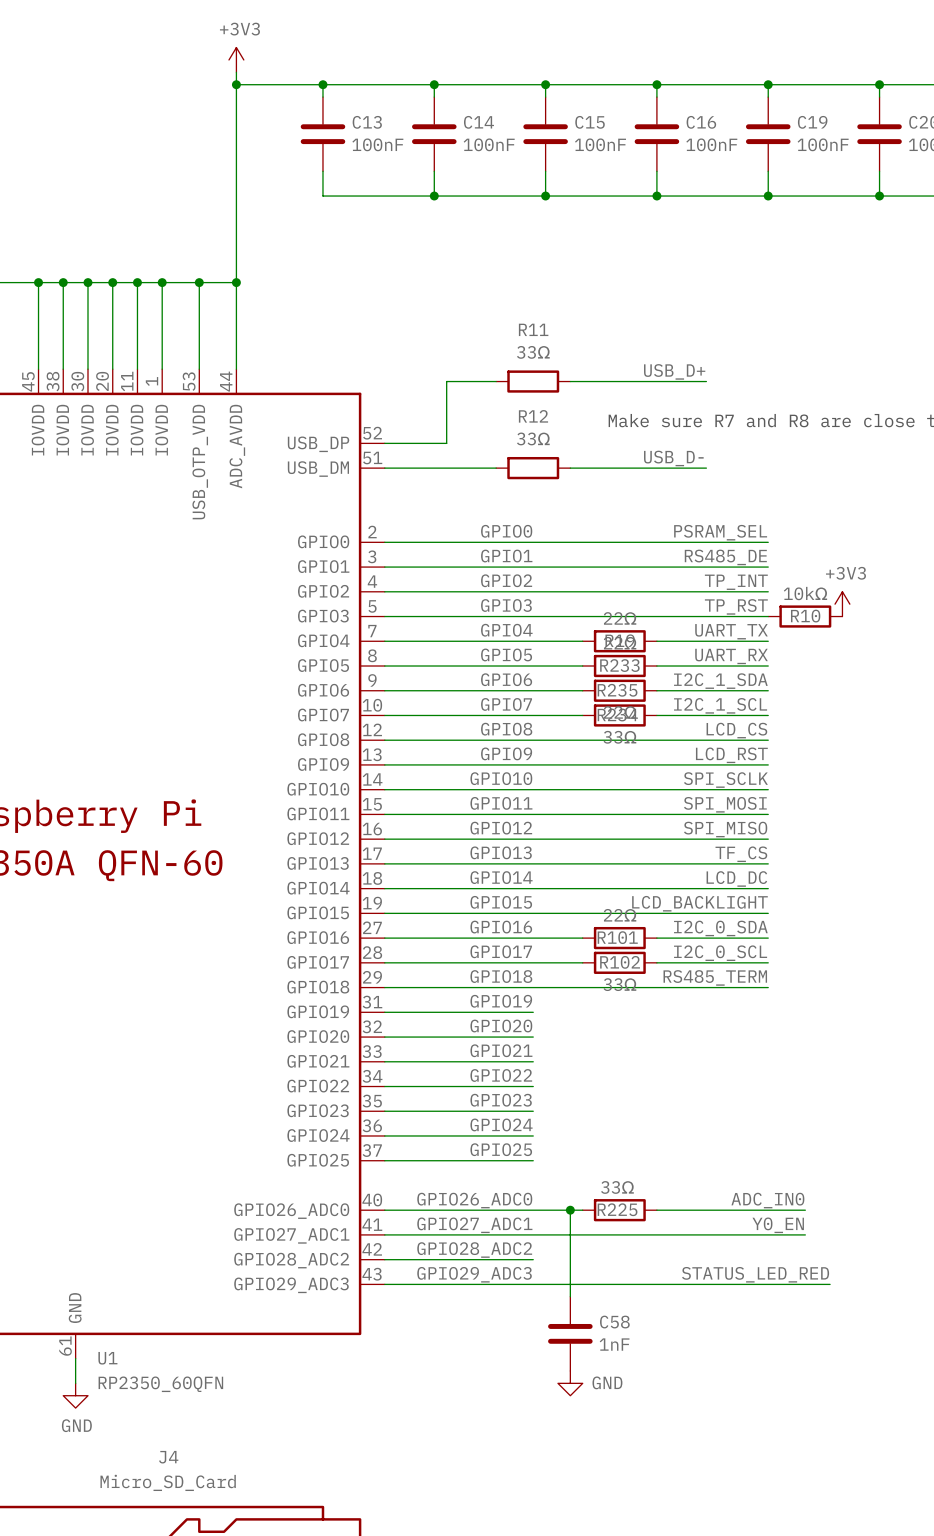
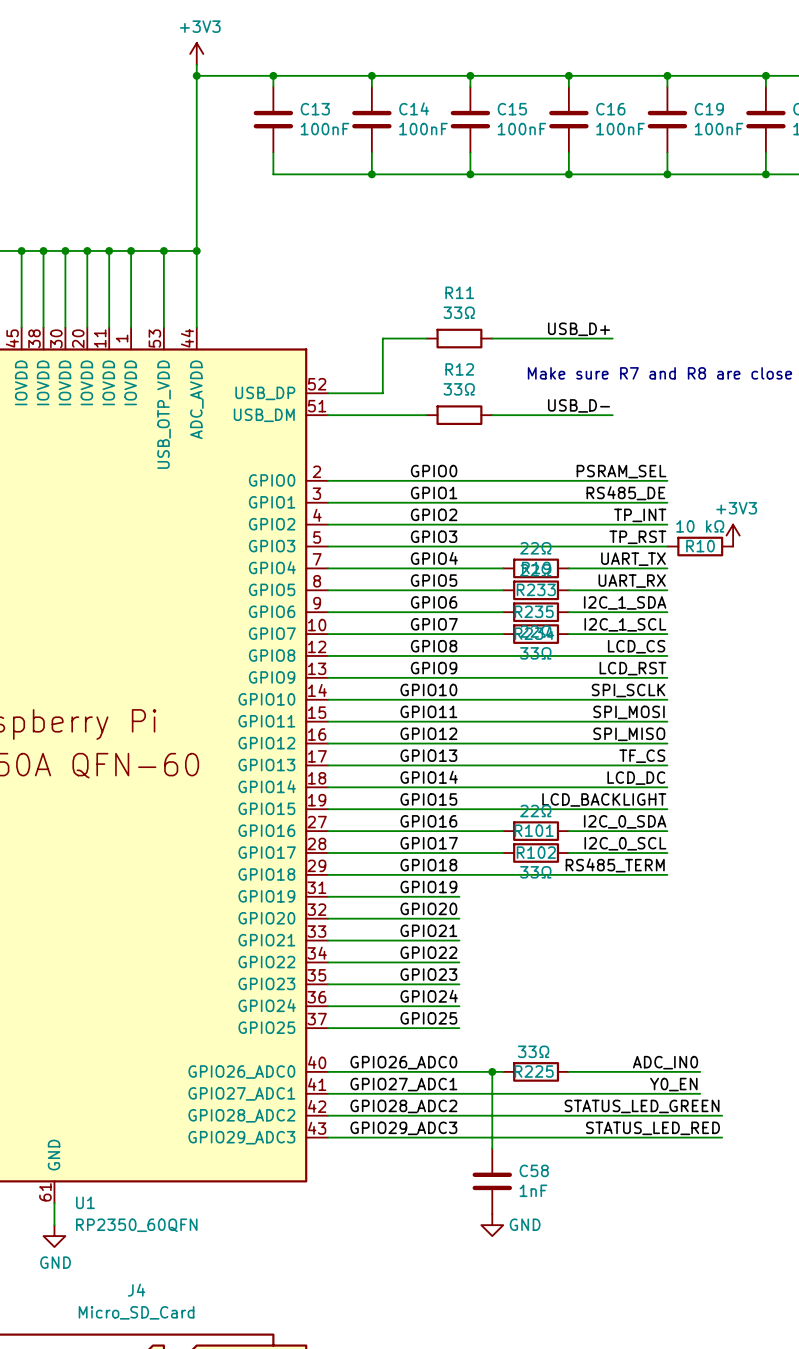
R10 value: 10kΩ (805, 593) -> 10 kΩ (700, 526)
label: none -> STATUS_LED_GREEN (642, 1106)
wire: none -> (459, 1115) (722, 1115)

